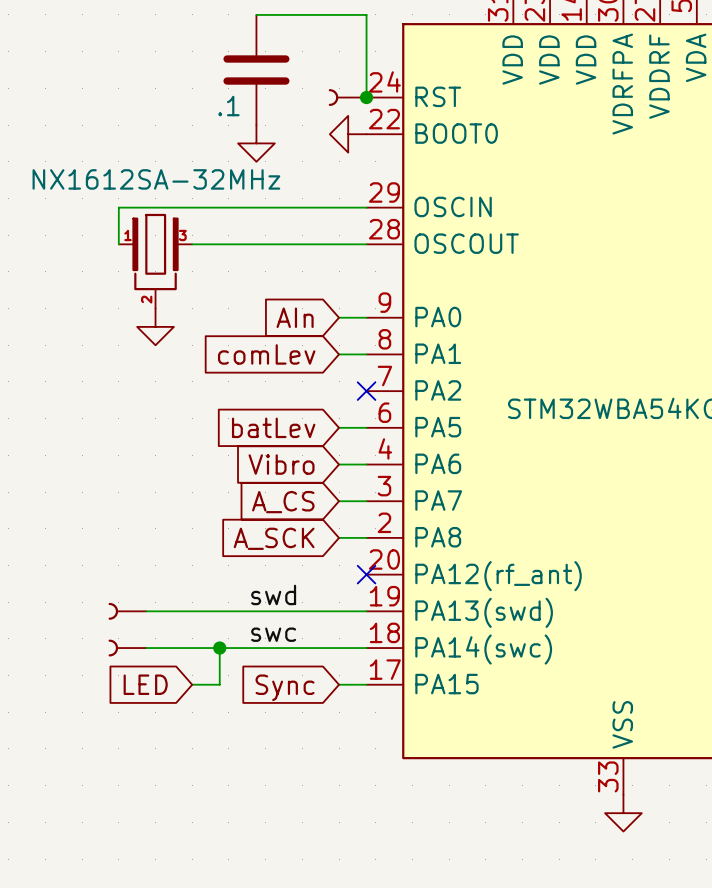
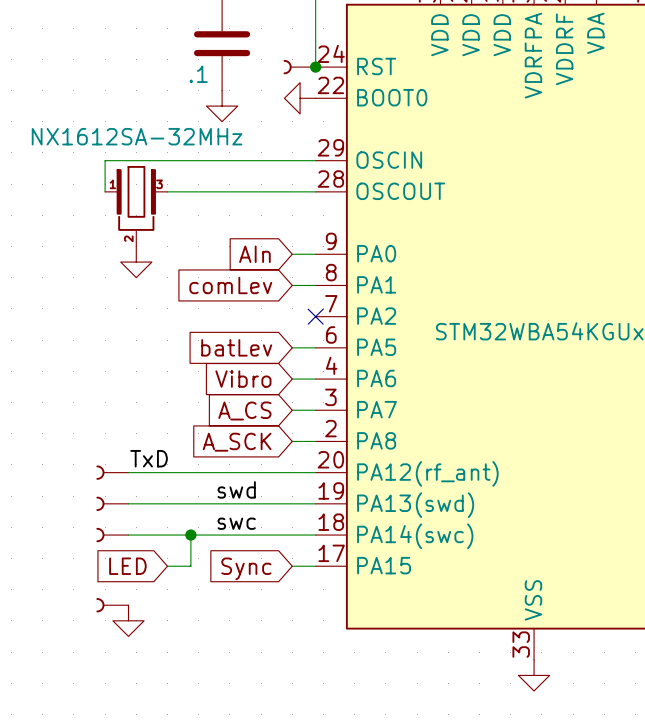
label: none -> TxD (149, 458)
part: none -> (112, 472)
wire: none -> (128, 472) (315, 472)
no-connect mark: (366, 574) -> none
part: none -> (112, 605)
power symbol: none -> (128, 620)

